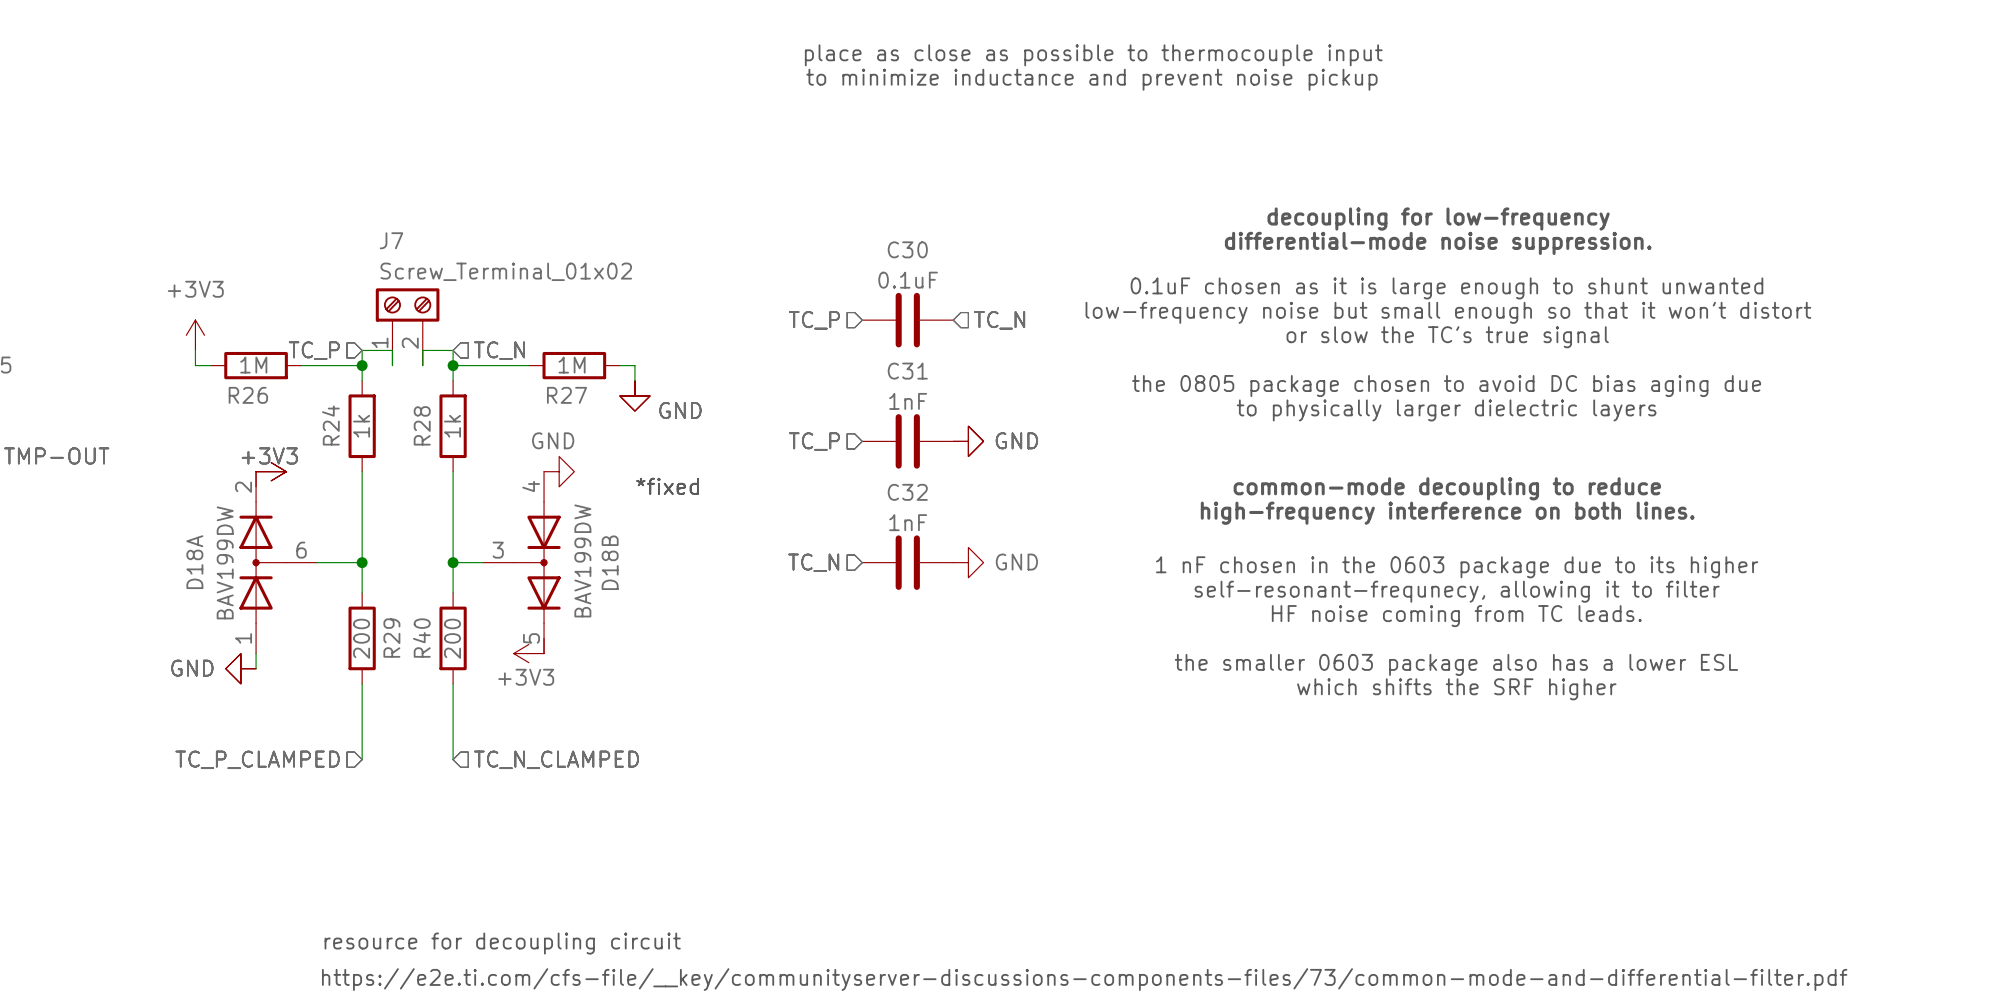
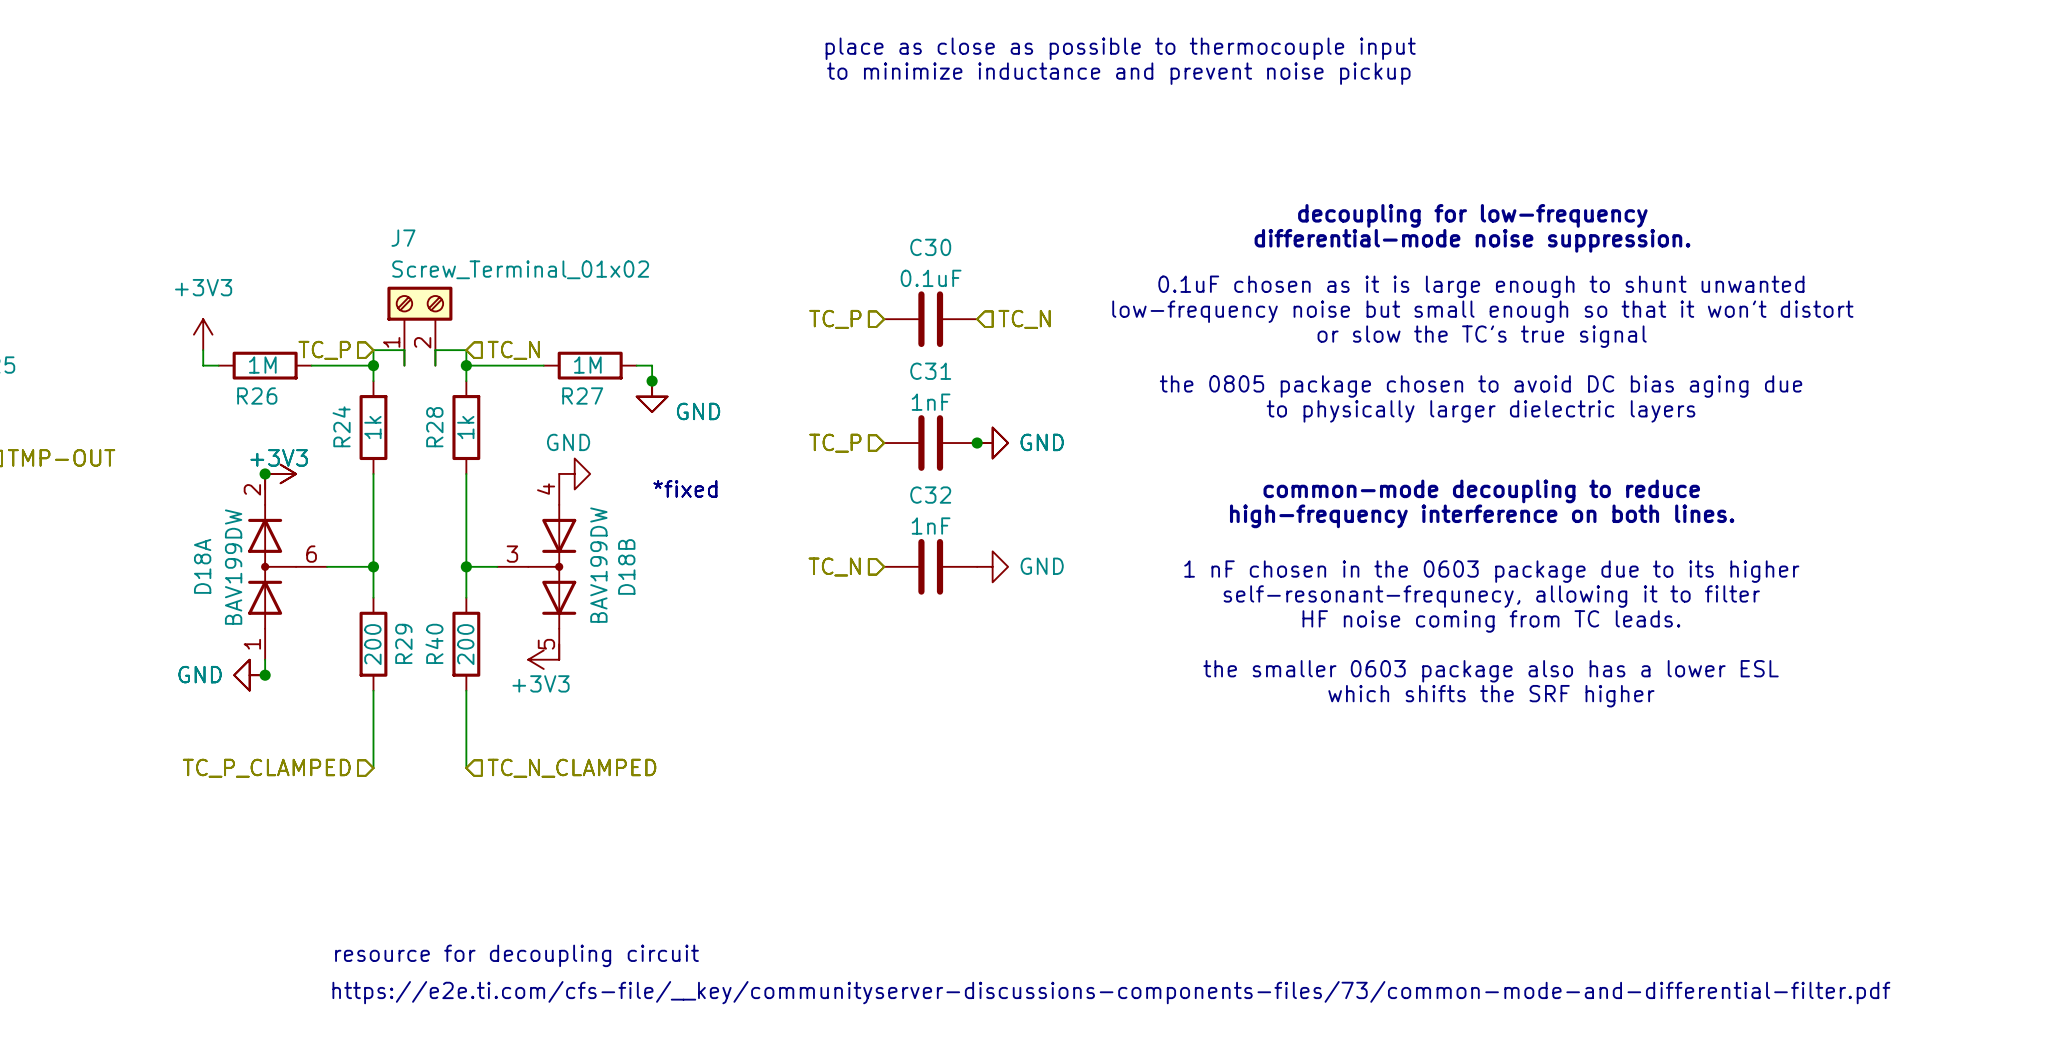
junction: none -> (652, 381)
junction: none -> (977, 443)
junction: none -> (265, 473)
junction: none -> (265, 675)

